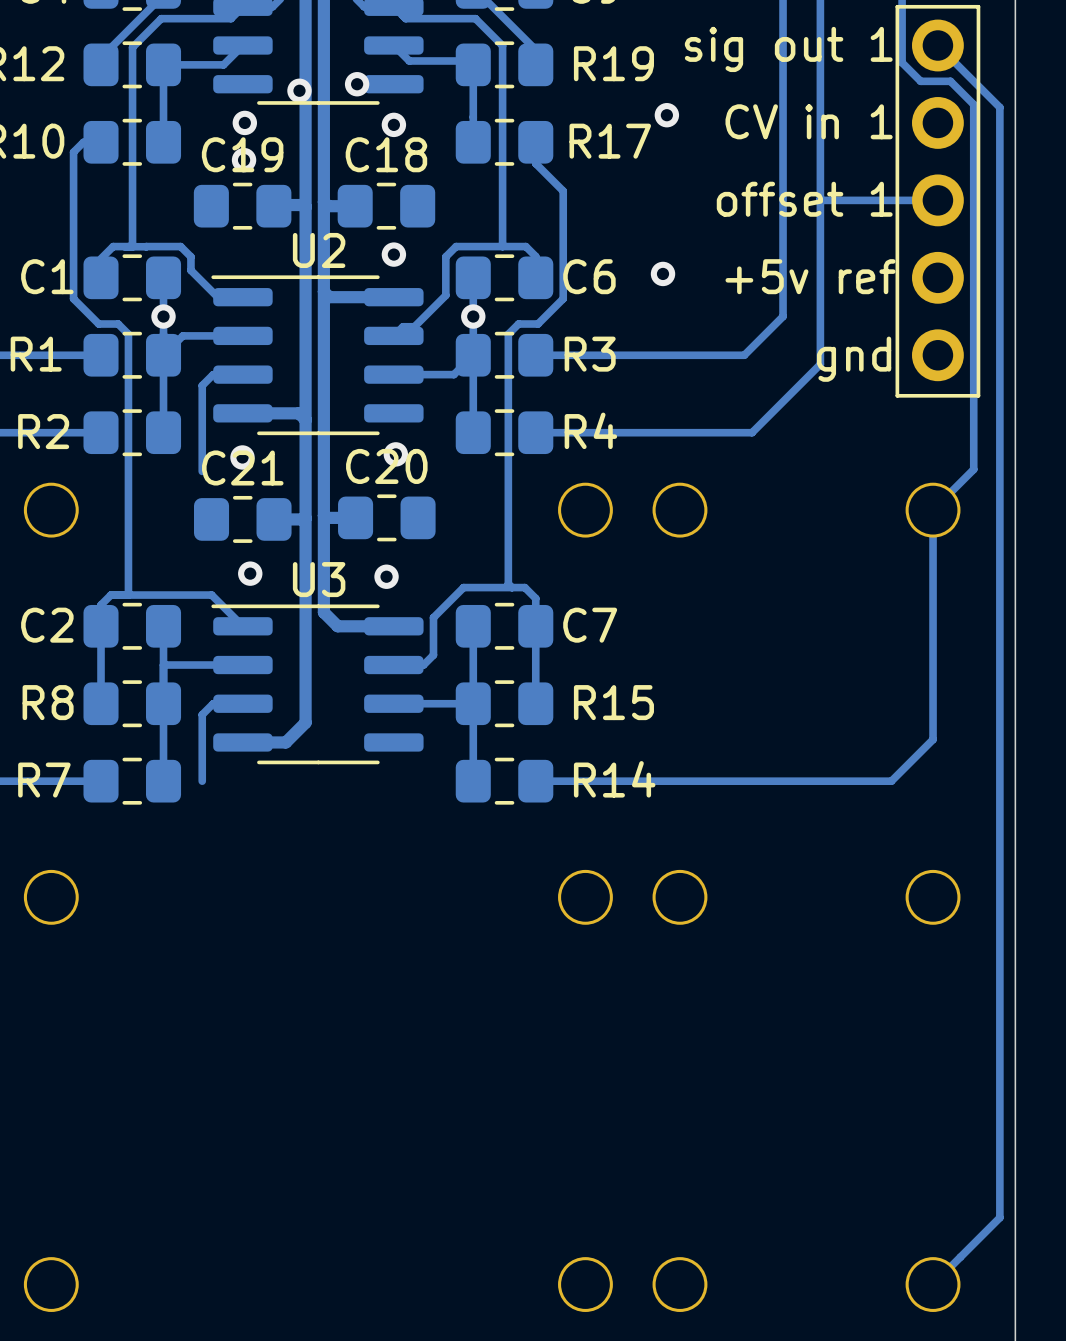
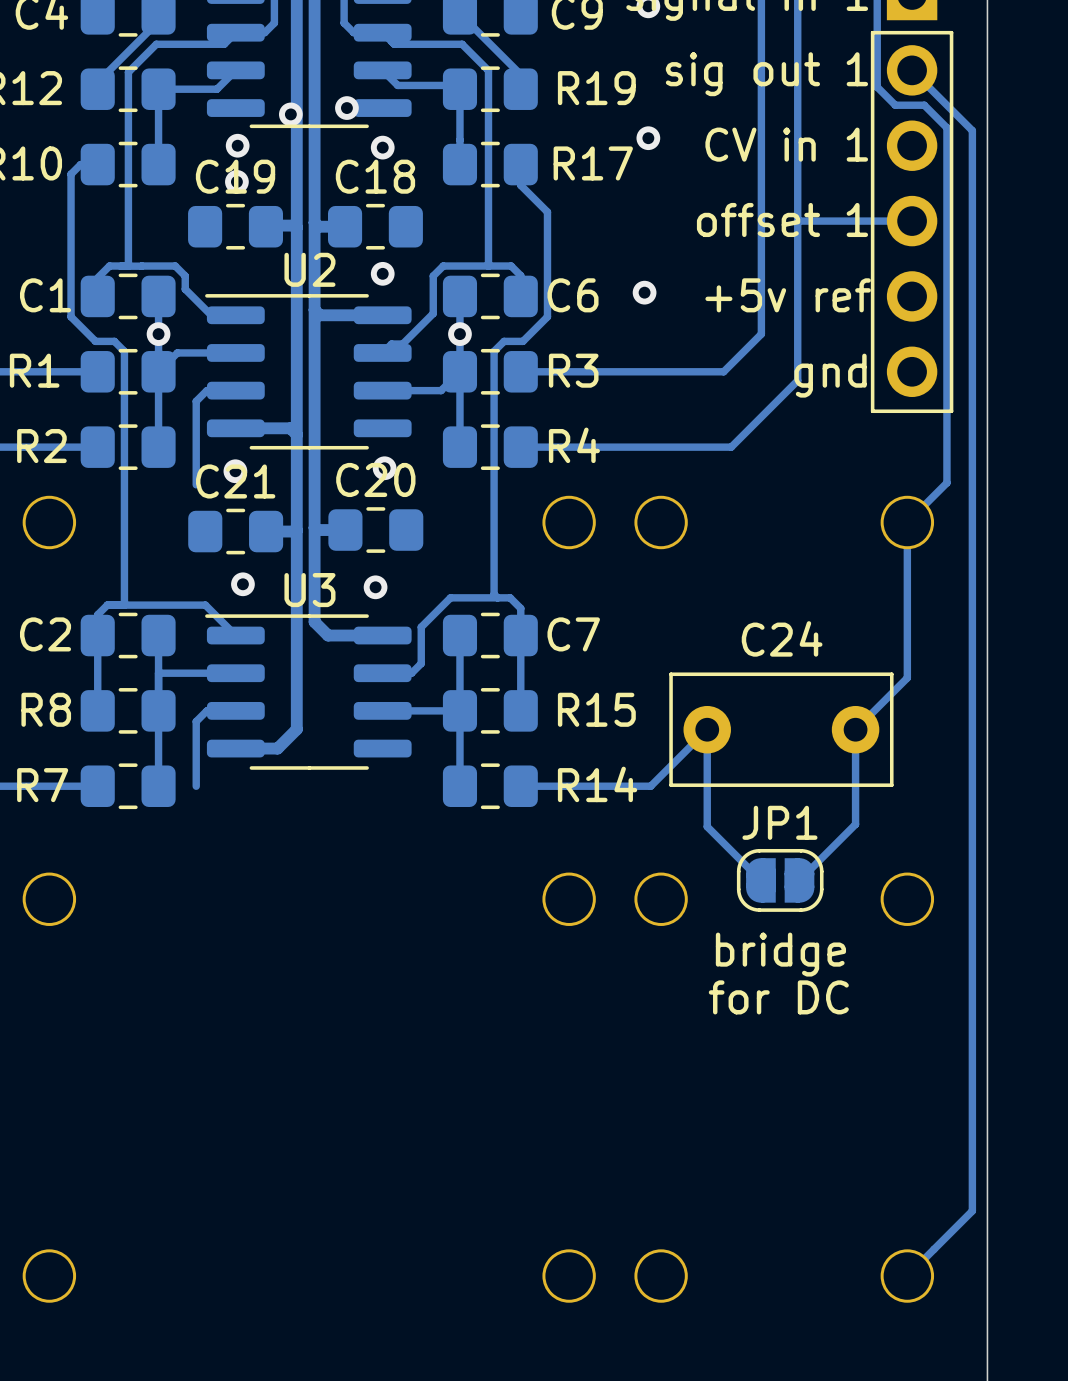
track: (933, 669) (933, 739) (891, 781) (669, 781) -> (907, 677) (855, 729) (855, 824) (799, 880)
C24: none -> (781, 729)
track: none -> (650, 786) (707, 729) (707, 826) (760, 880)
JP1: none -> (780, 880)
text: none -> bridge (780, 954)
text: none -> for DC (778, 997)

